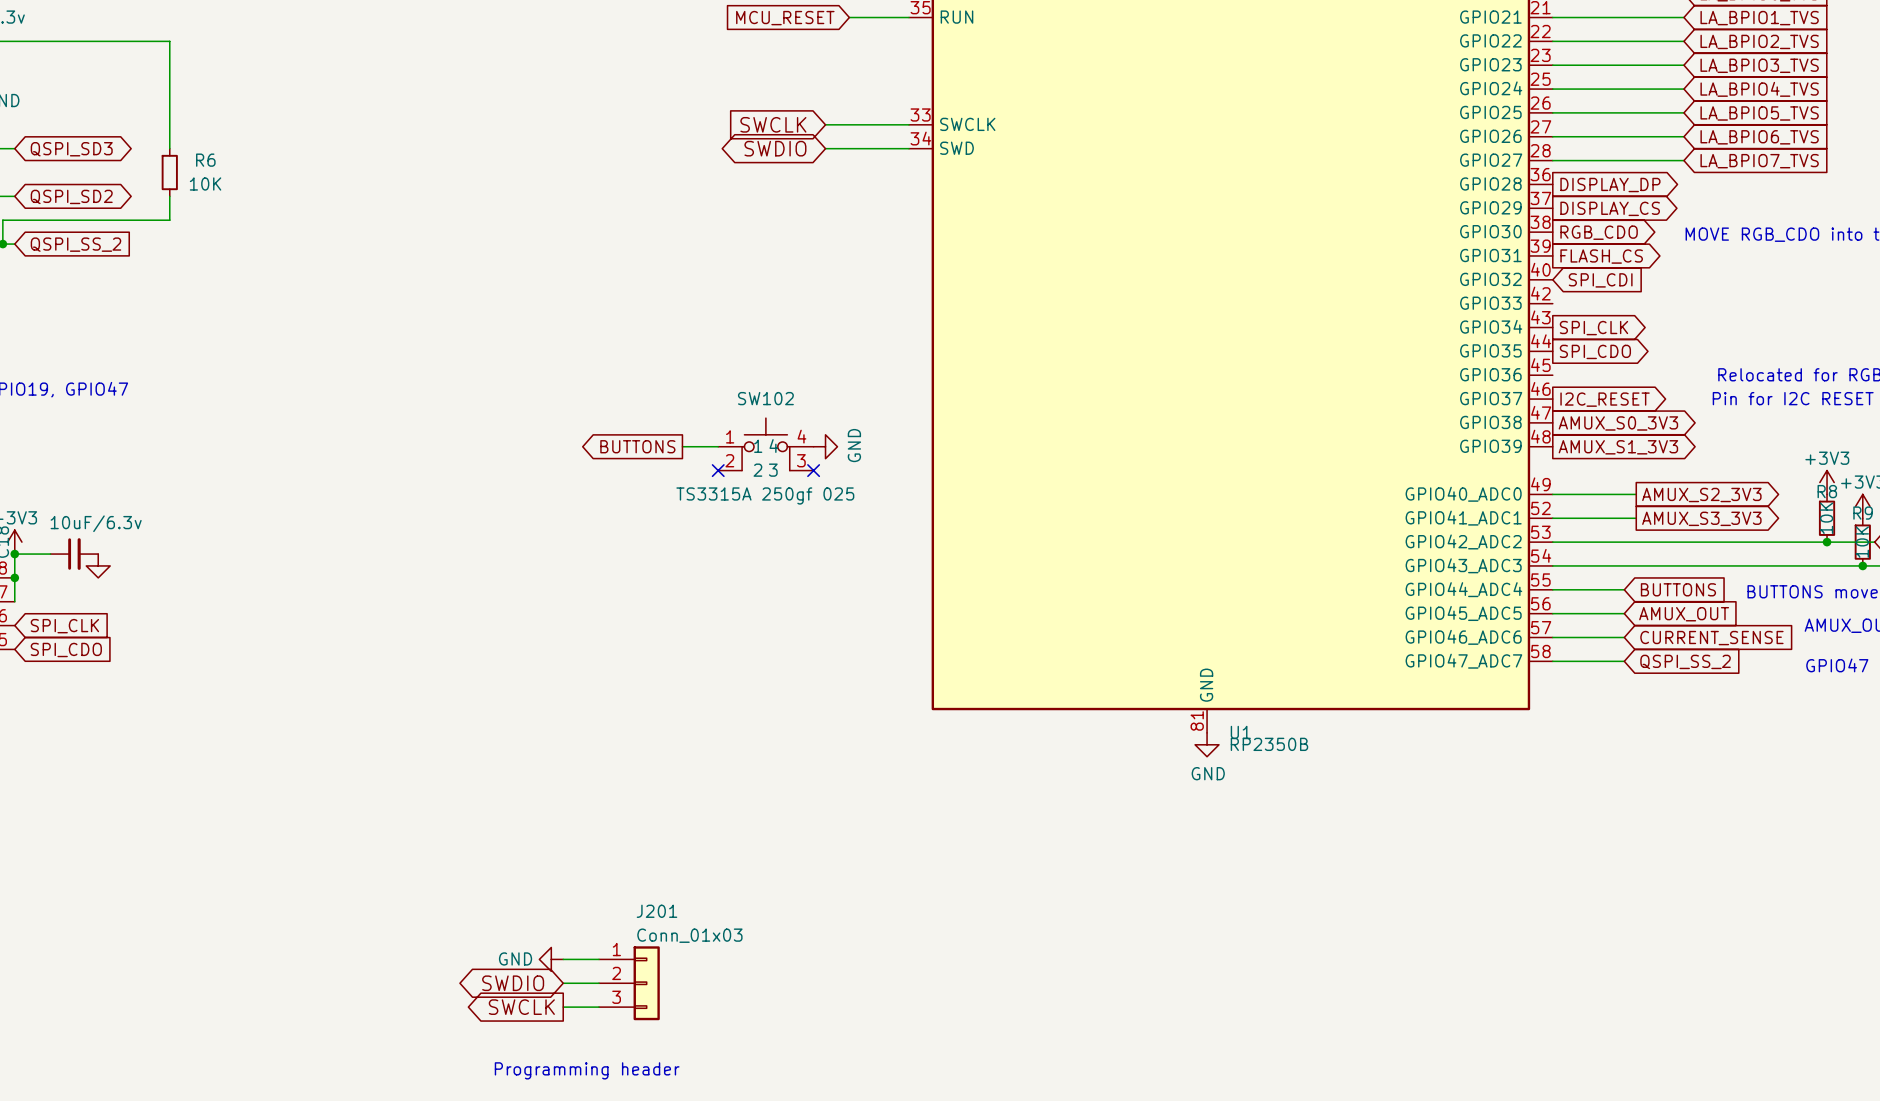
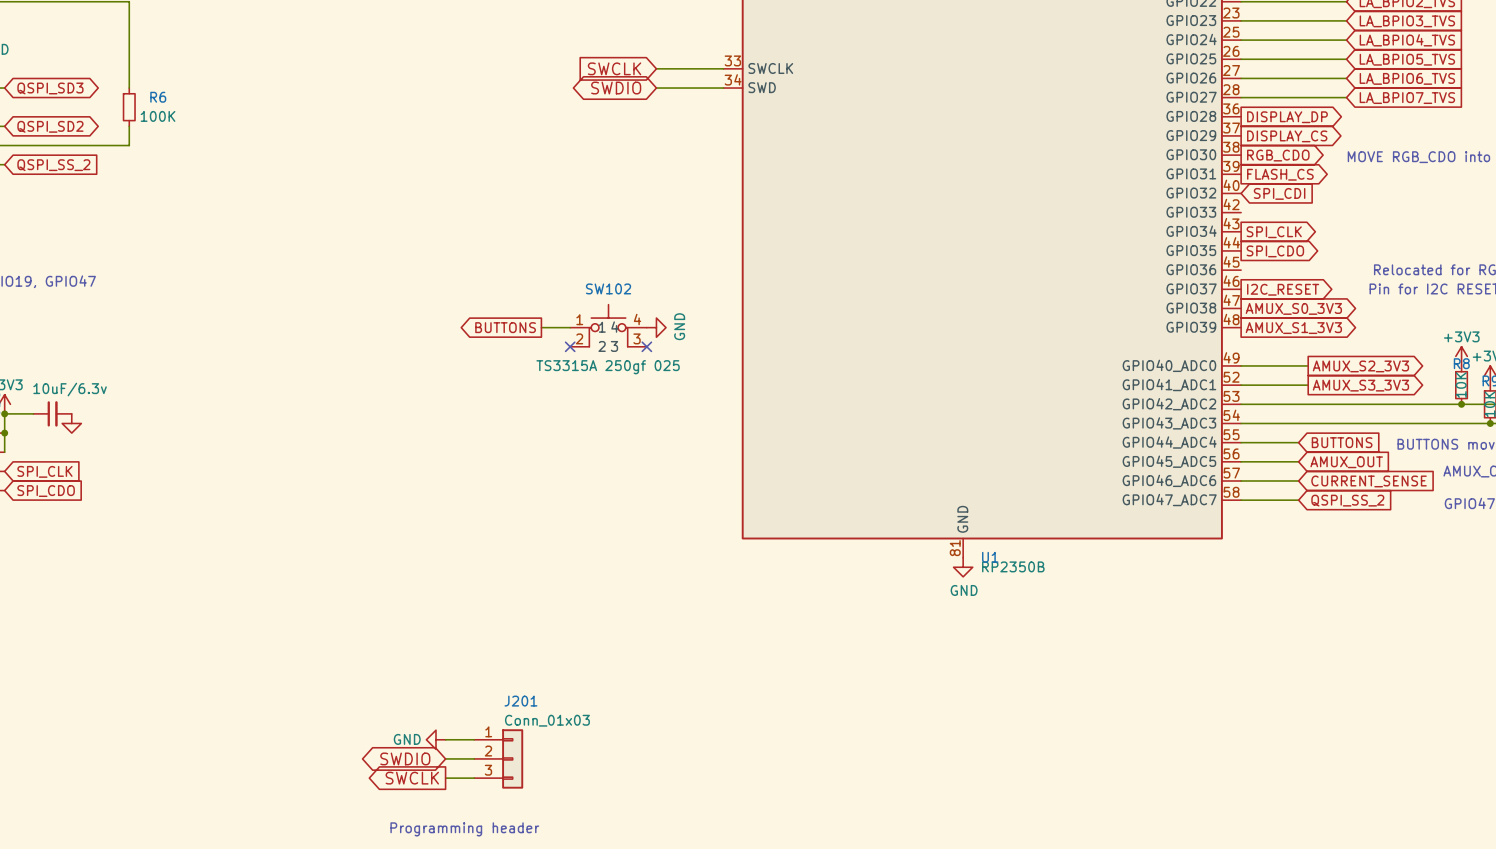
R6 value: 10K (205, 183) -> 100K (158, 116)

